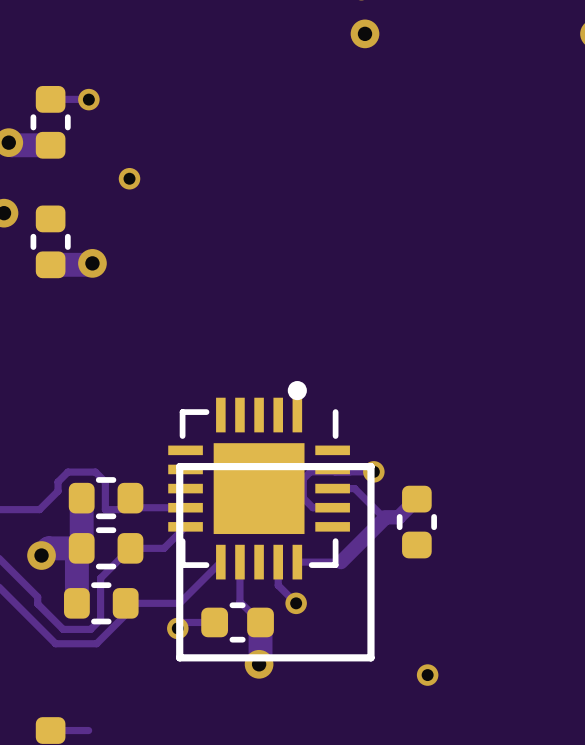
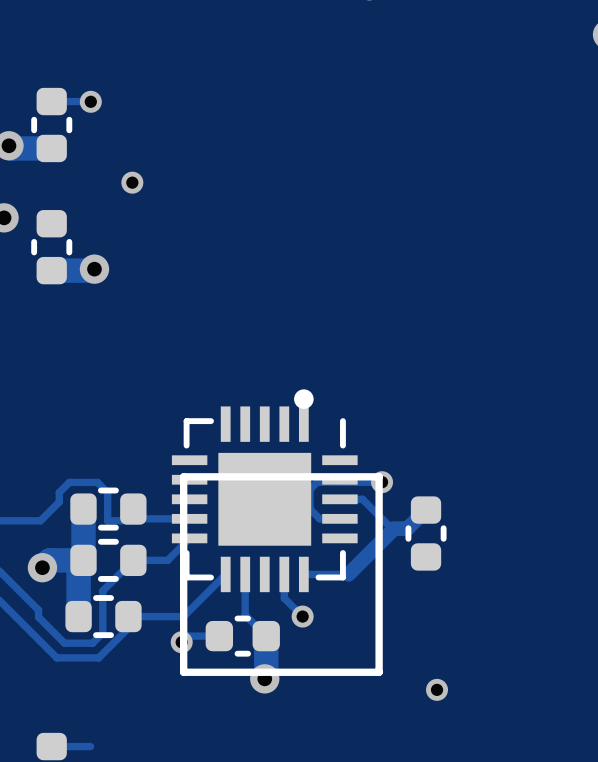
via: (365, 33) -> none

